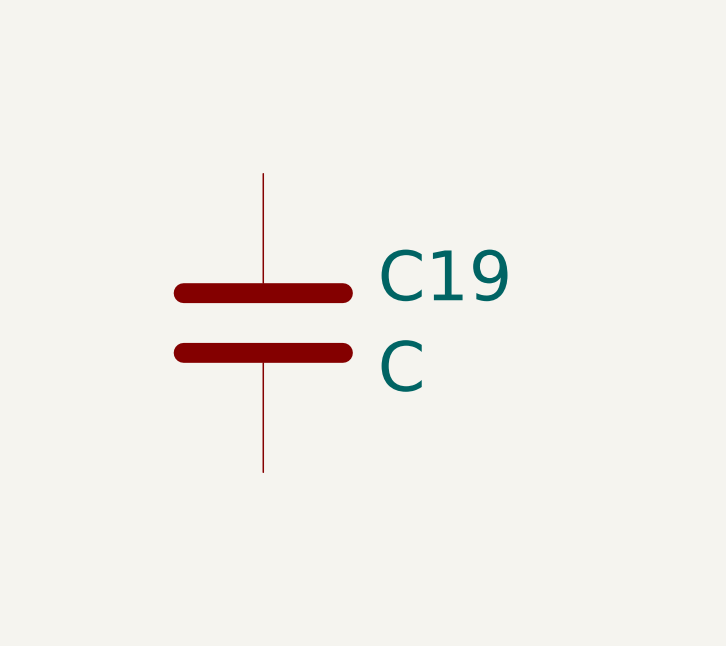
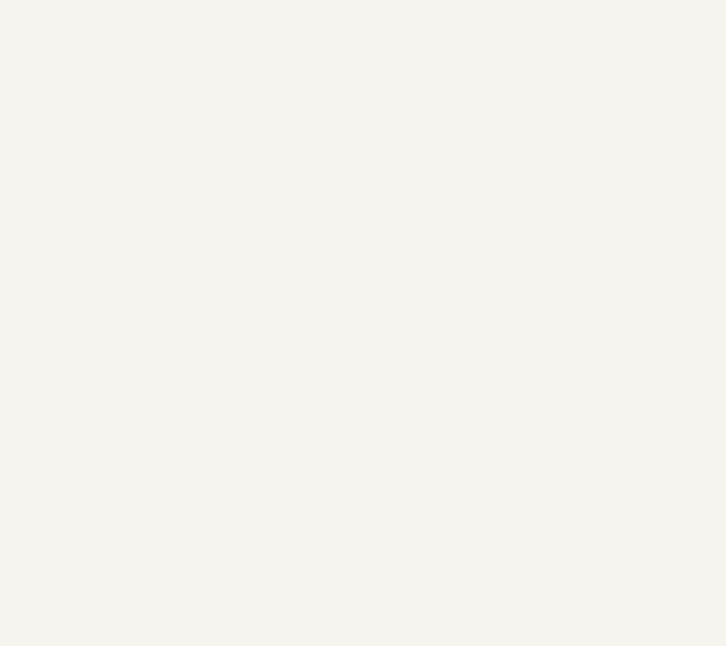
C19: C (263, 323) -> none

